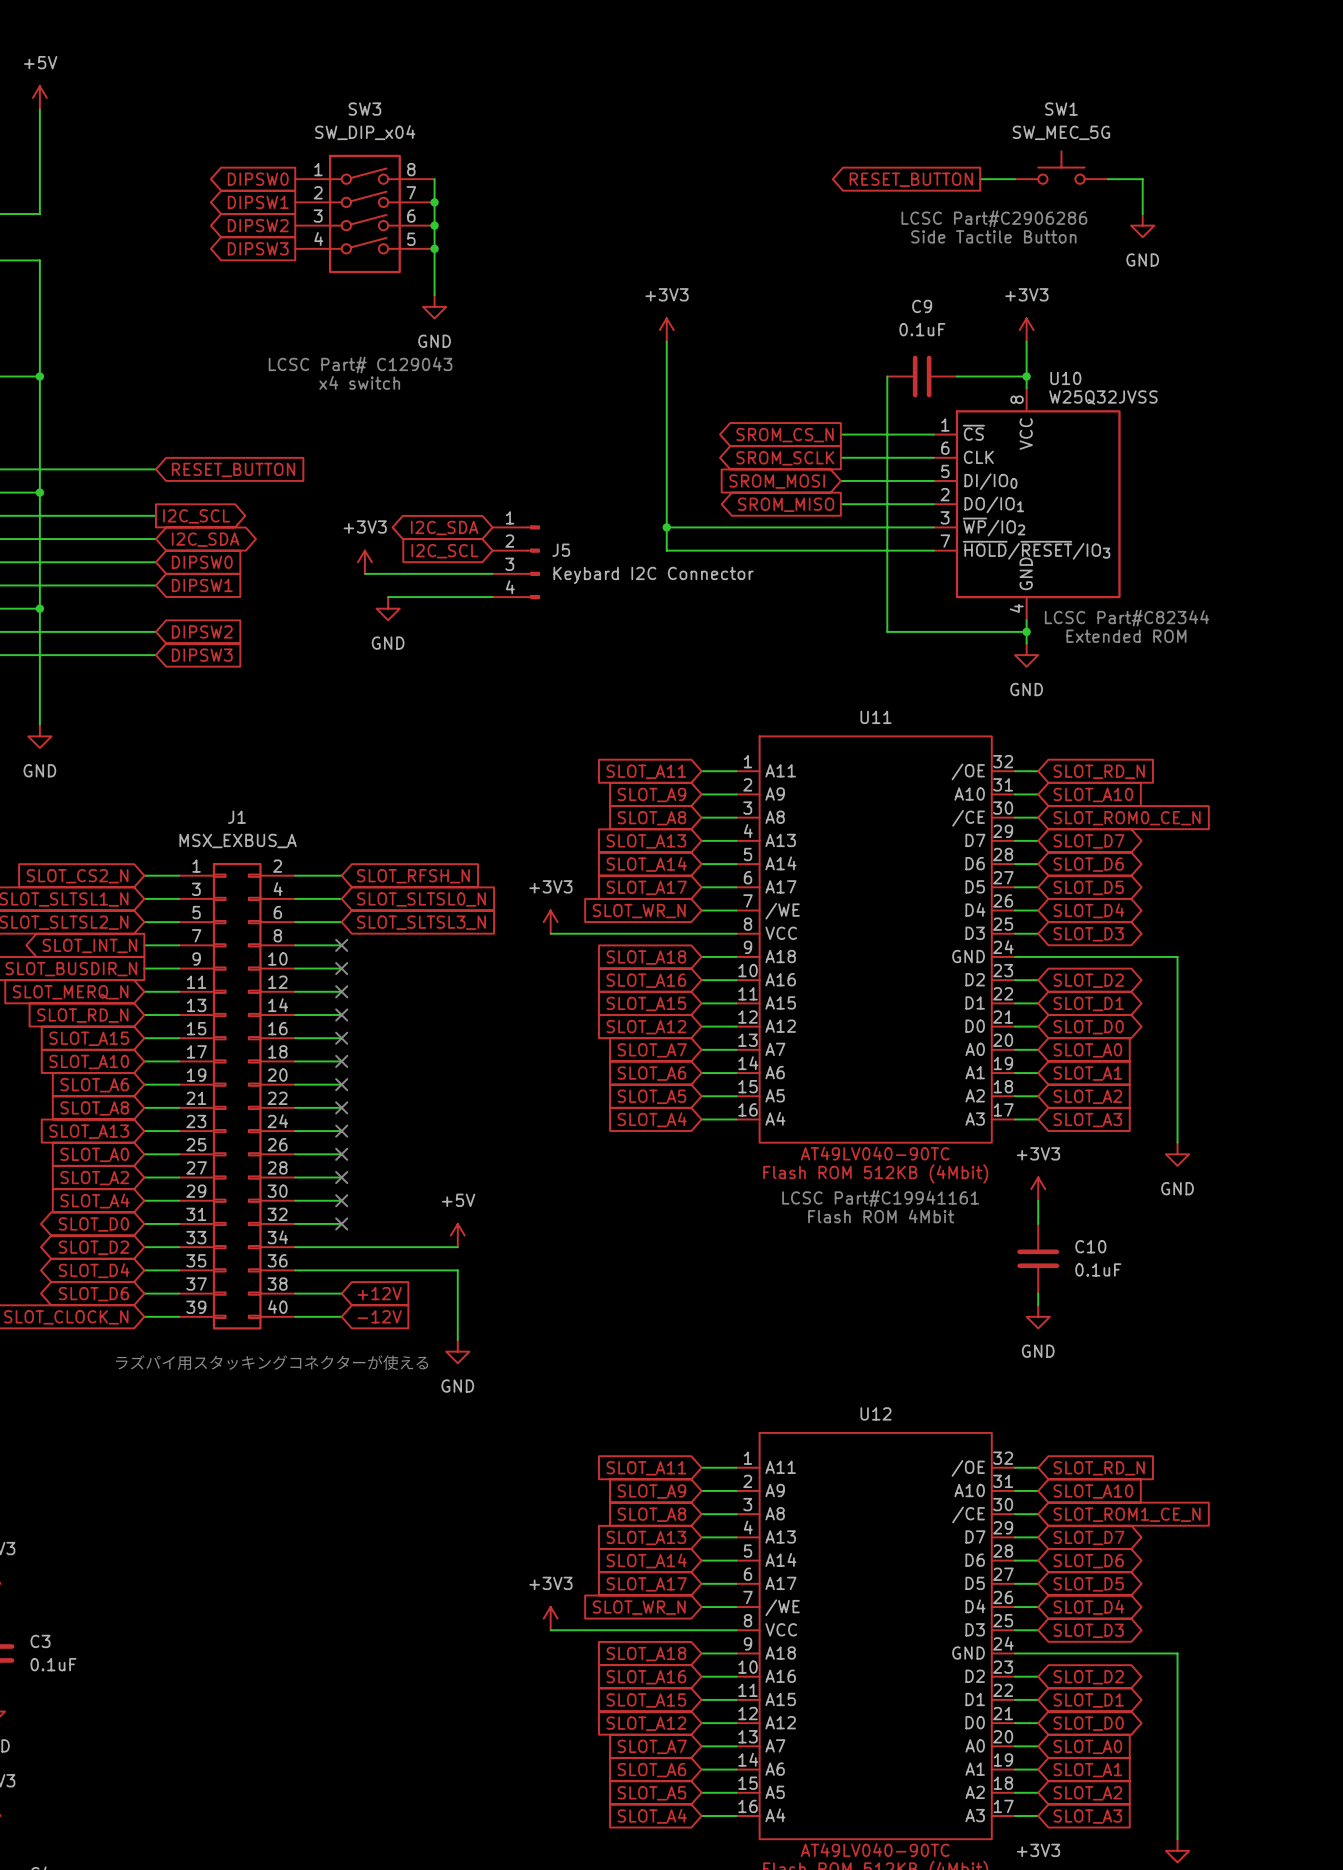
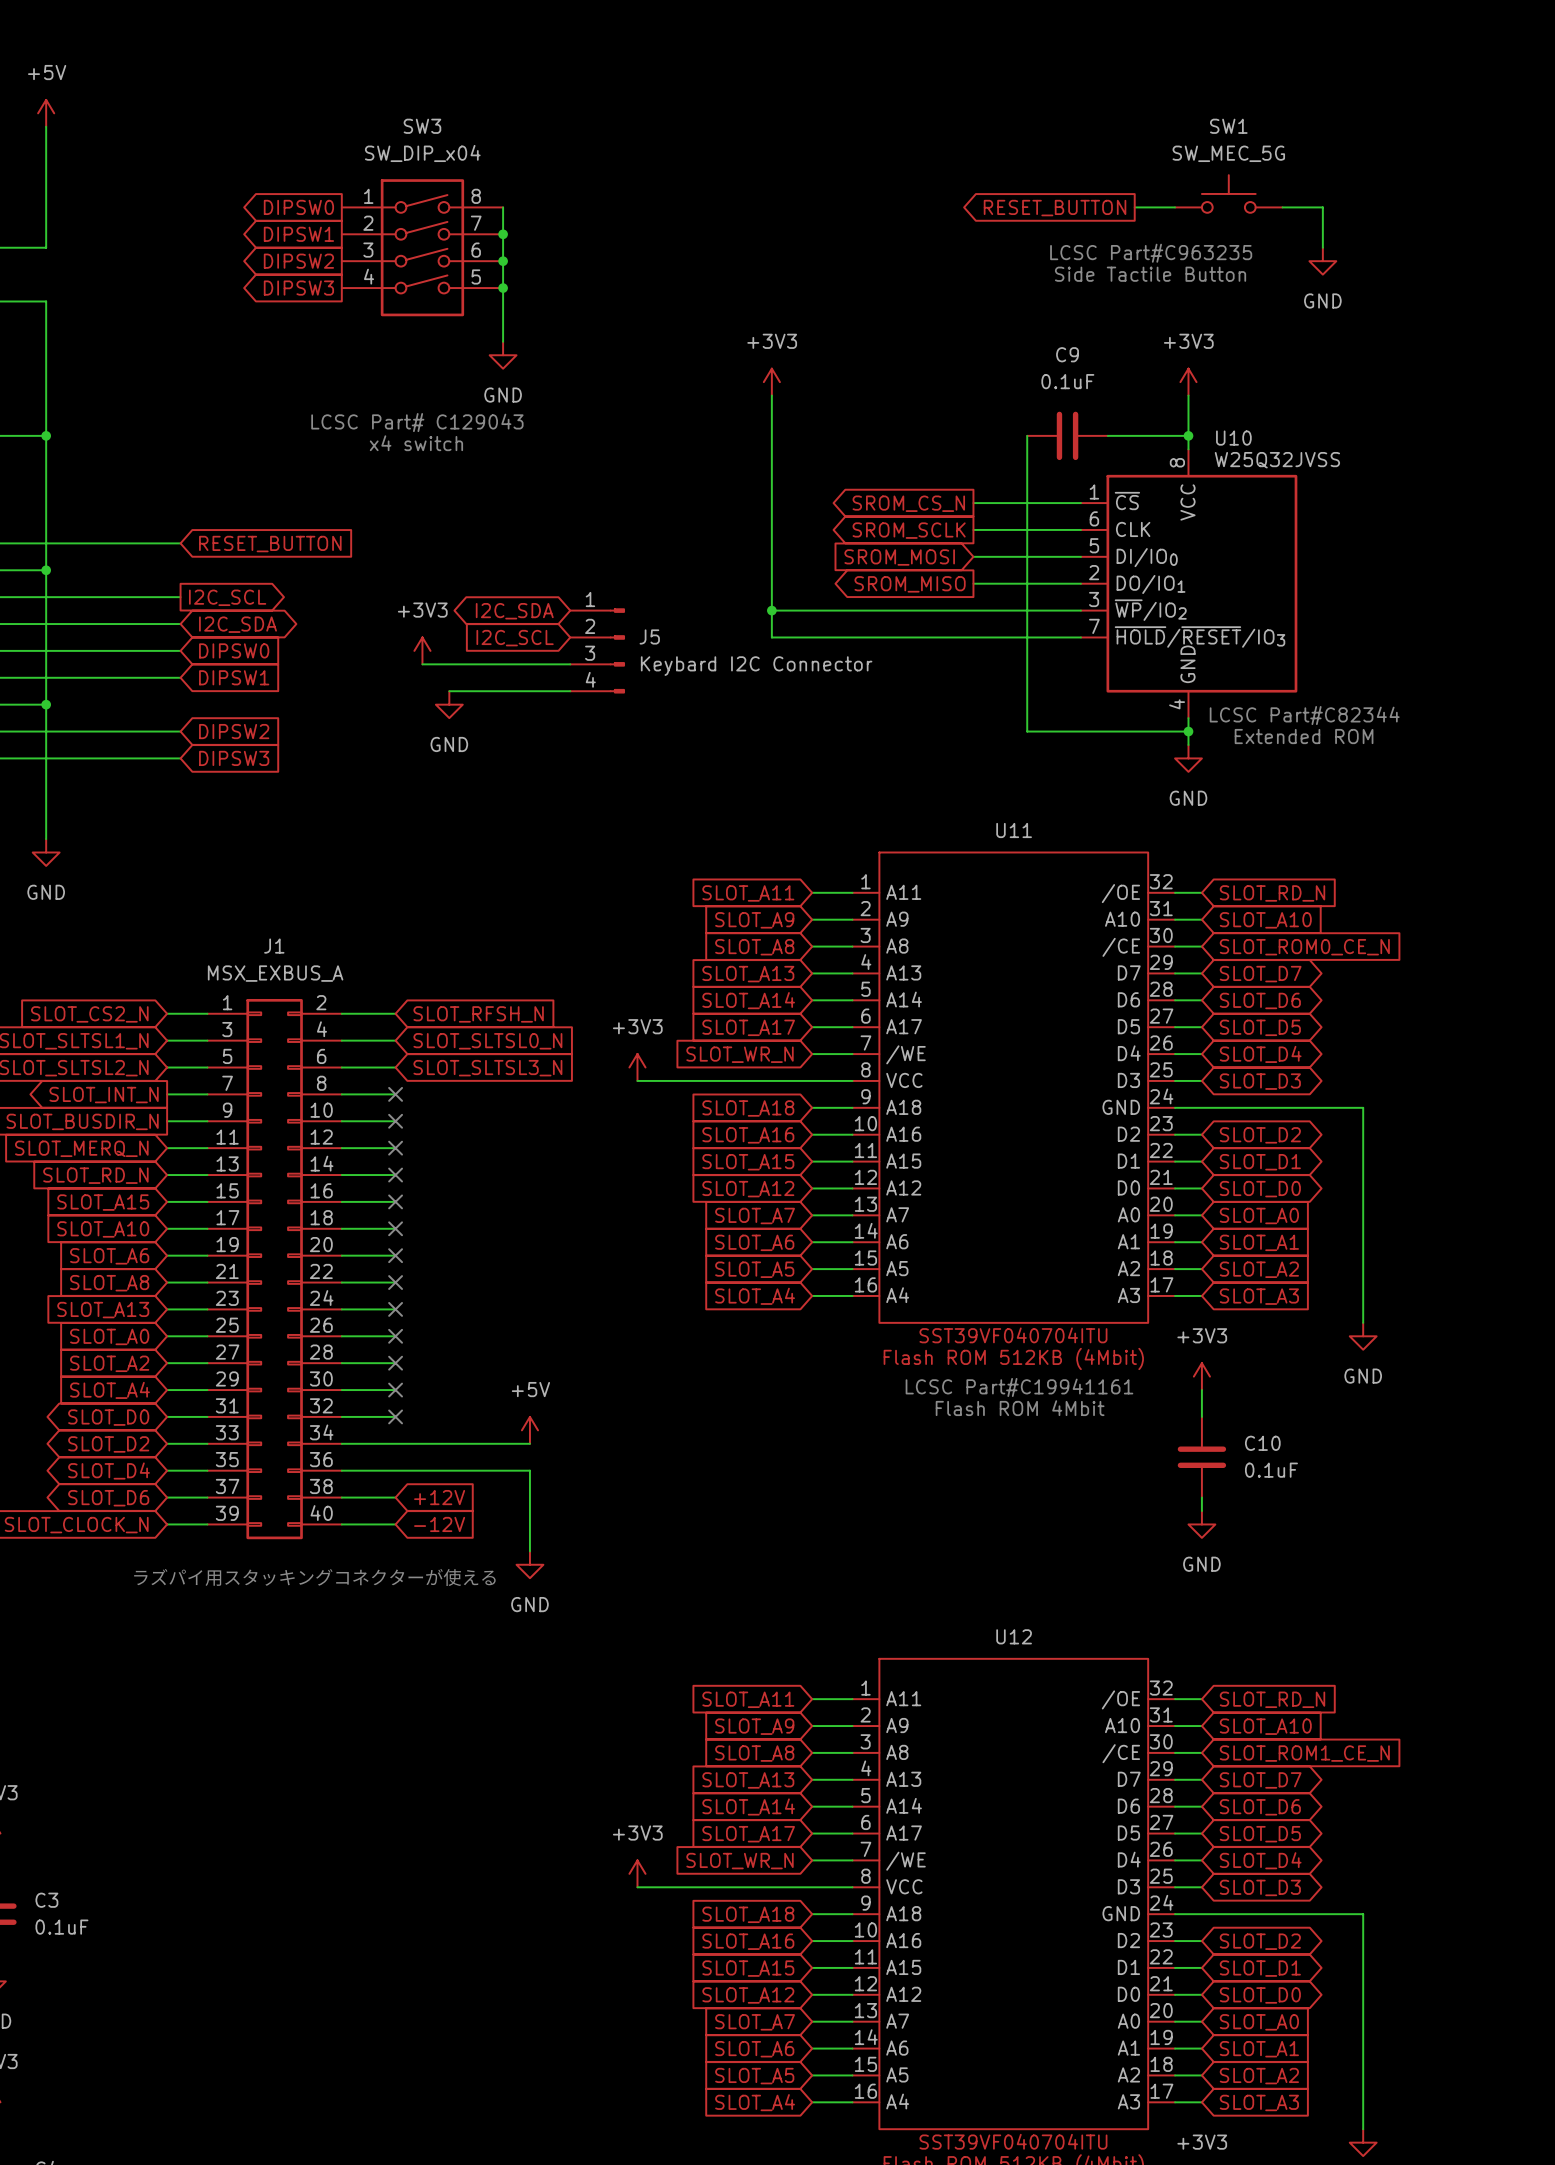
text: LCSC Part#C2906286 (994, 218) -> LCSC Part#C963235 (1151, 253)
U11 text: AT49LV040-90TC (875, 1153) -> SST39VF040704ITU (1013, 1335)
U12 text: AT49LV040-90TC (875, 1850) -> SST39VF040704ITU (1013, 2141)

